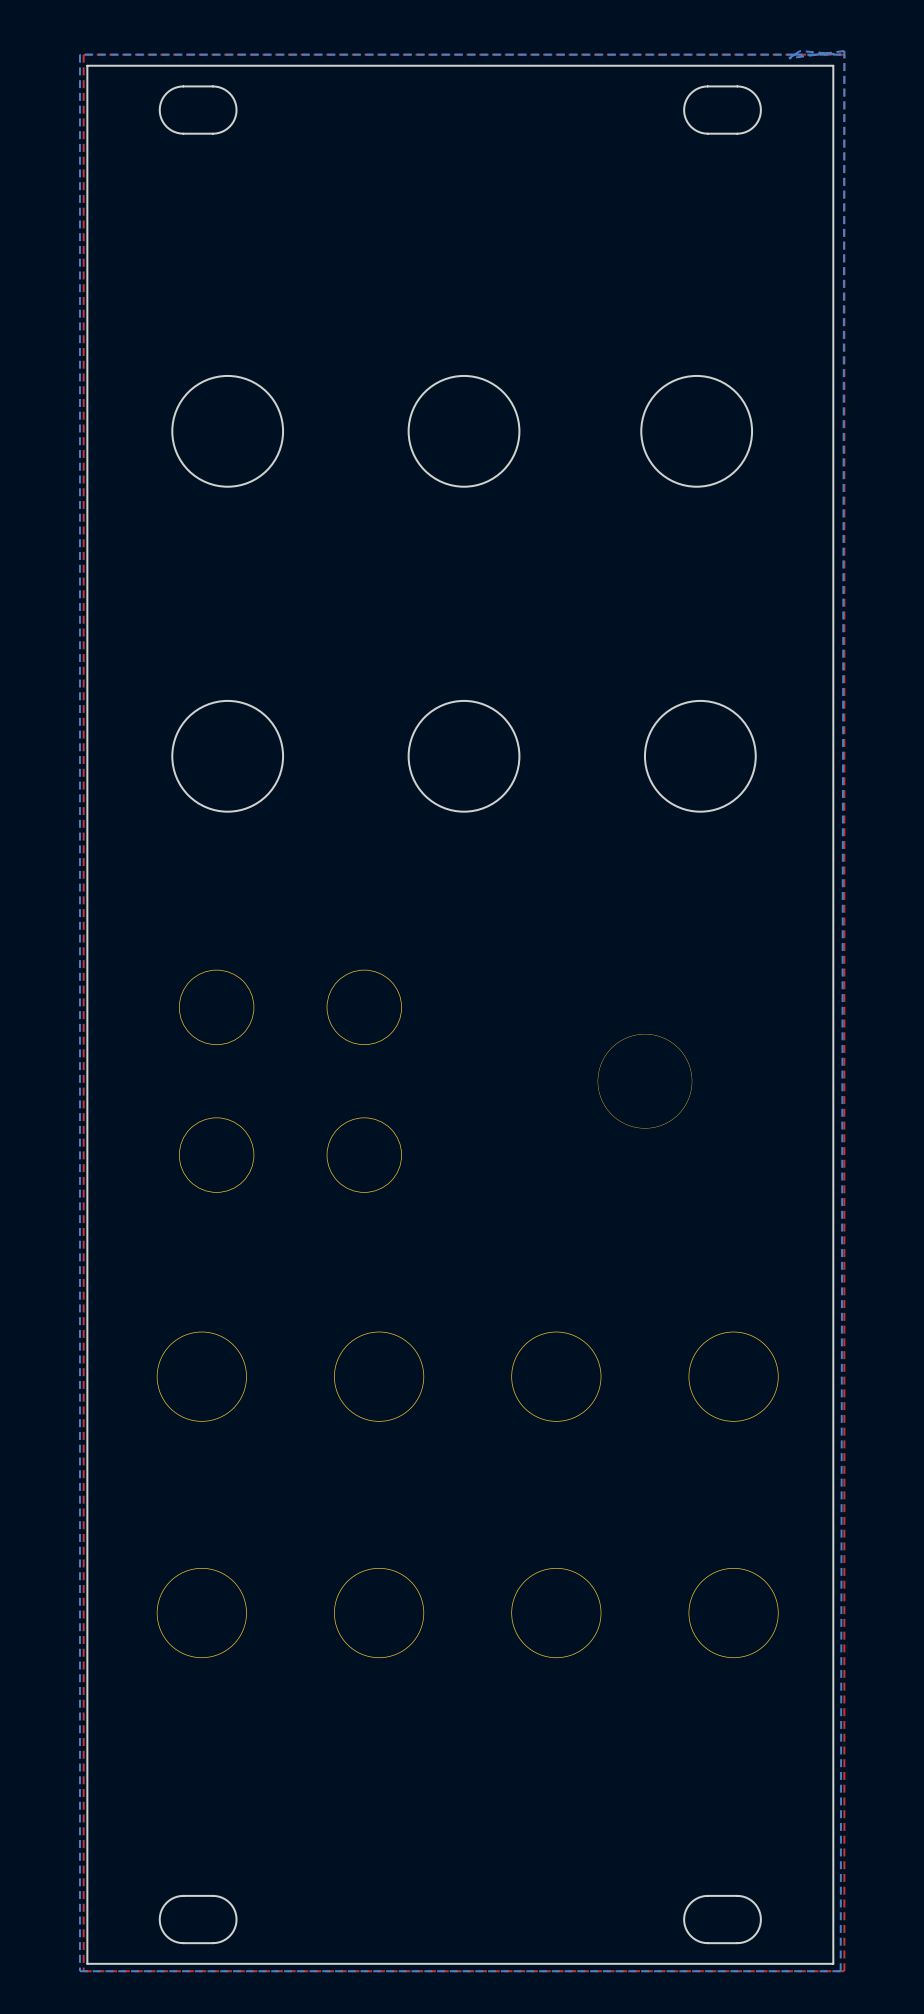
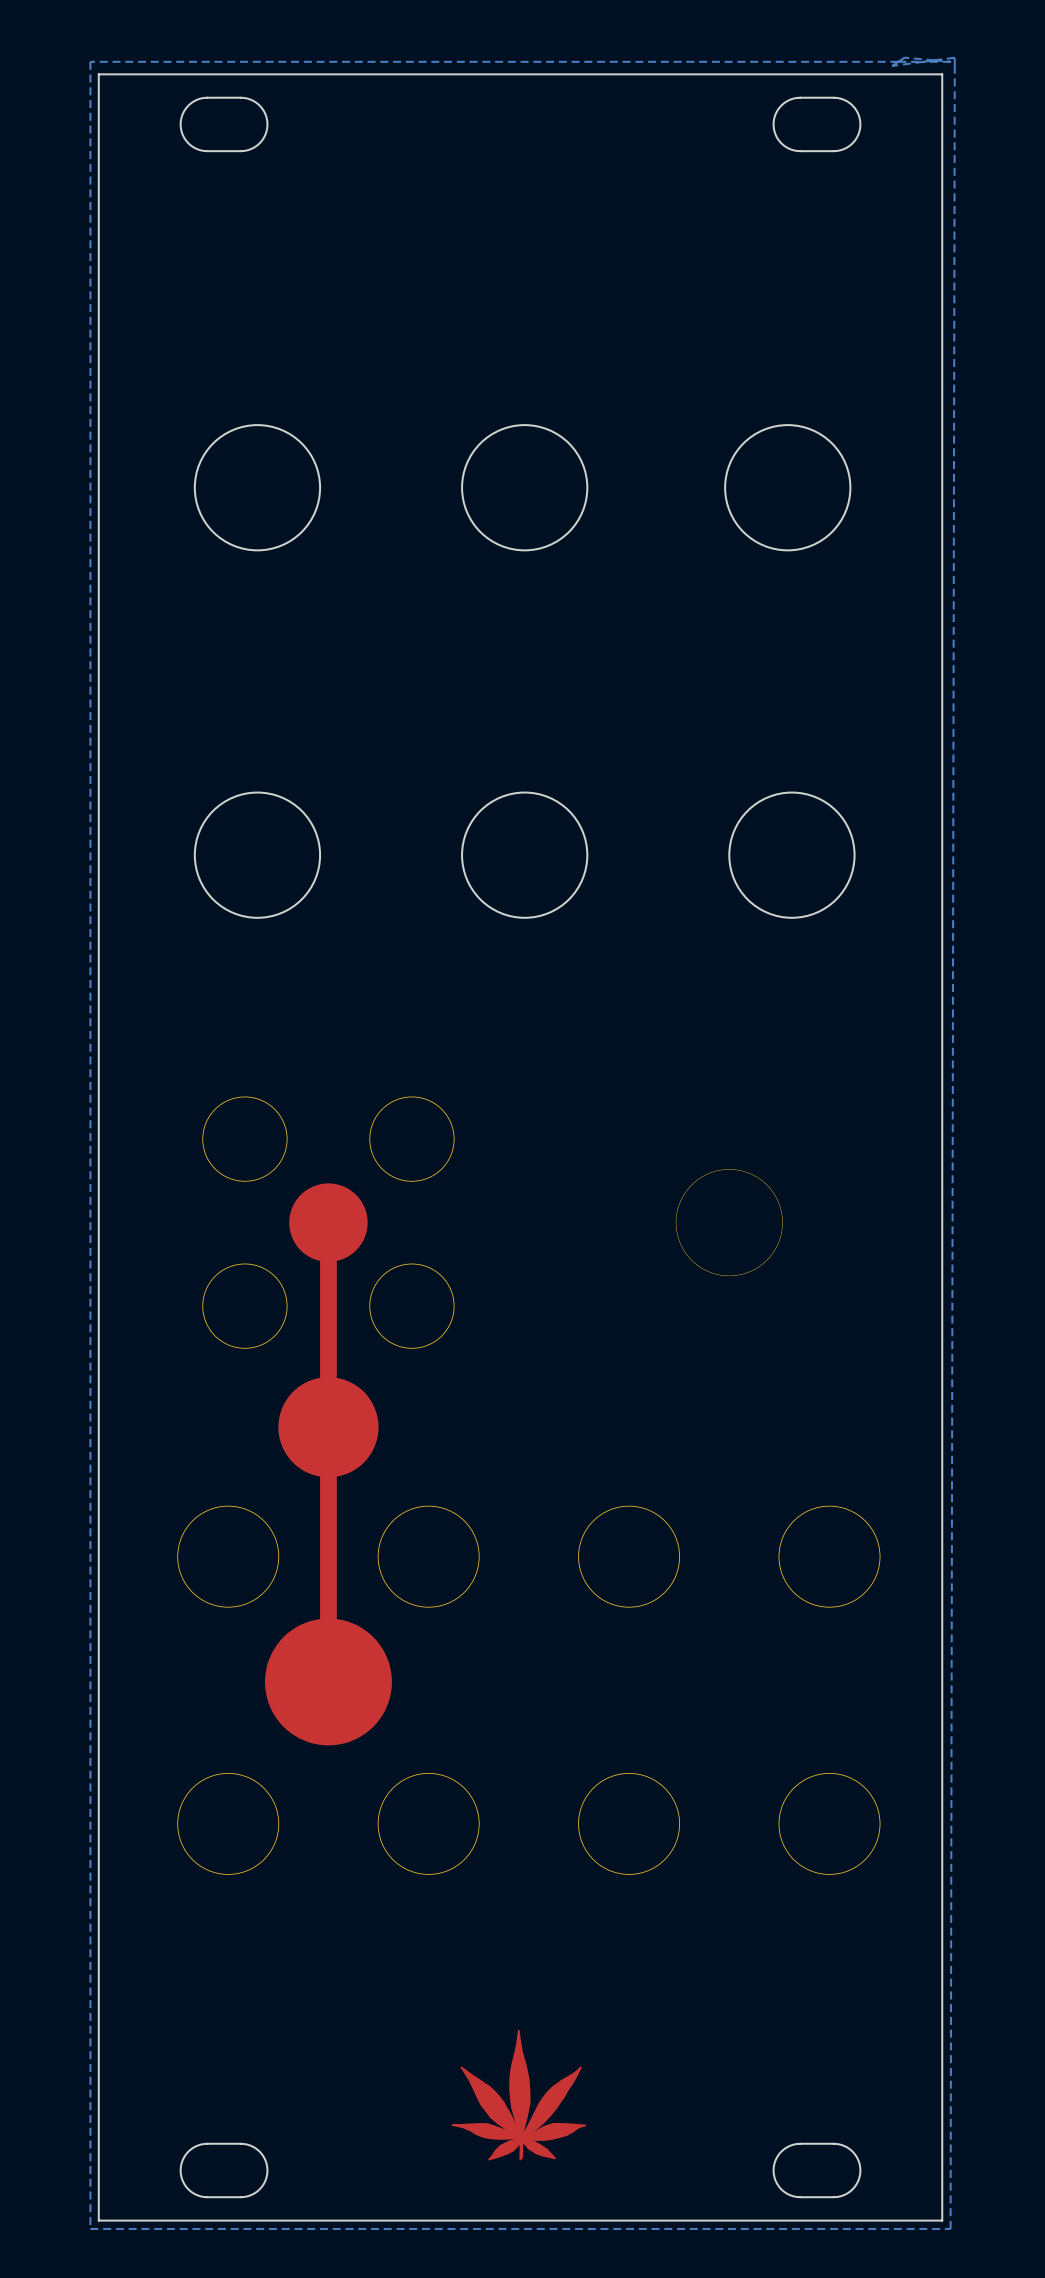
top zone outline: (844, 54) (844, 1971) (83, 1971) (83, 54) (844, 54) -> none
drawing: none -> [289, 1183, 368, 1262]
top track: none -> (328, 1222) (328, 1681)
drawing: none -> [278, 1377, 379, 1478]
drawing: none -> [264, 1618, 392, 1746]
drawing: none -> [451, 2029, 587, 2161]

